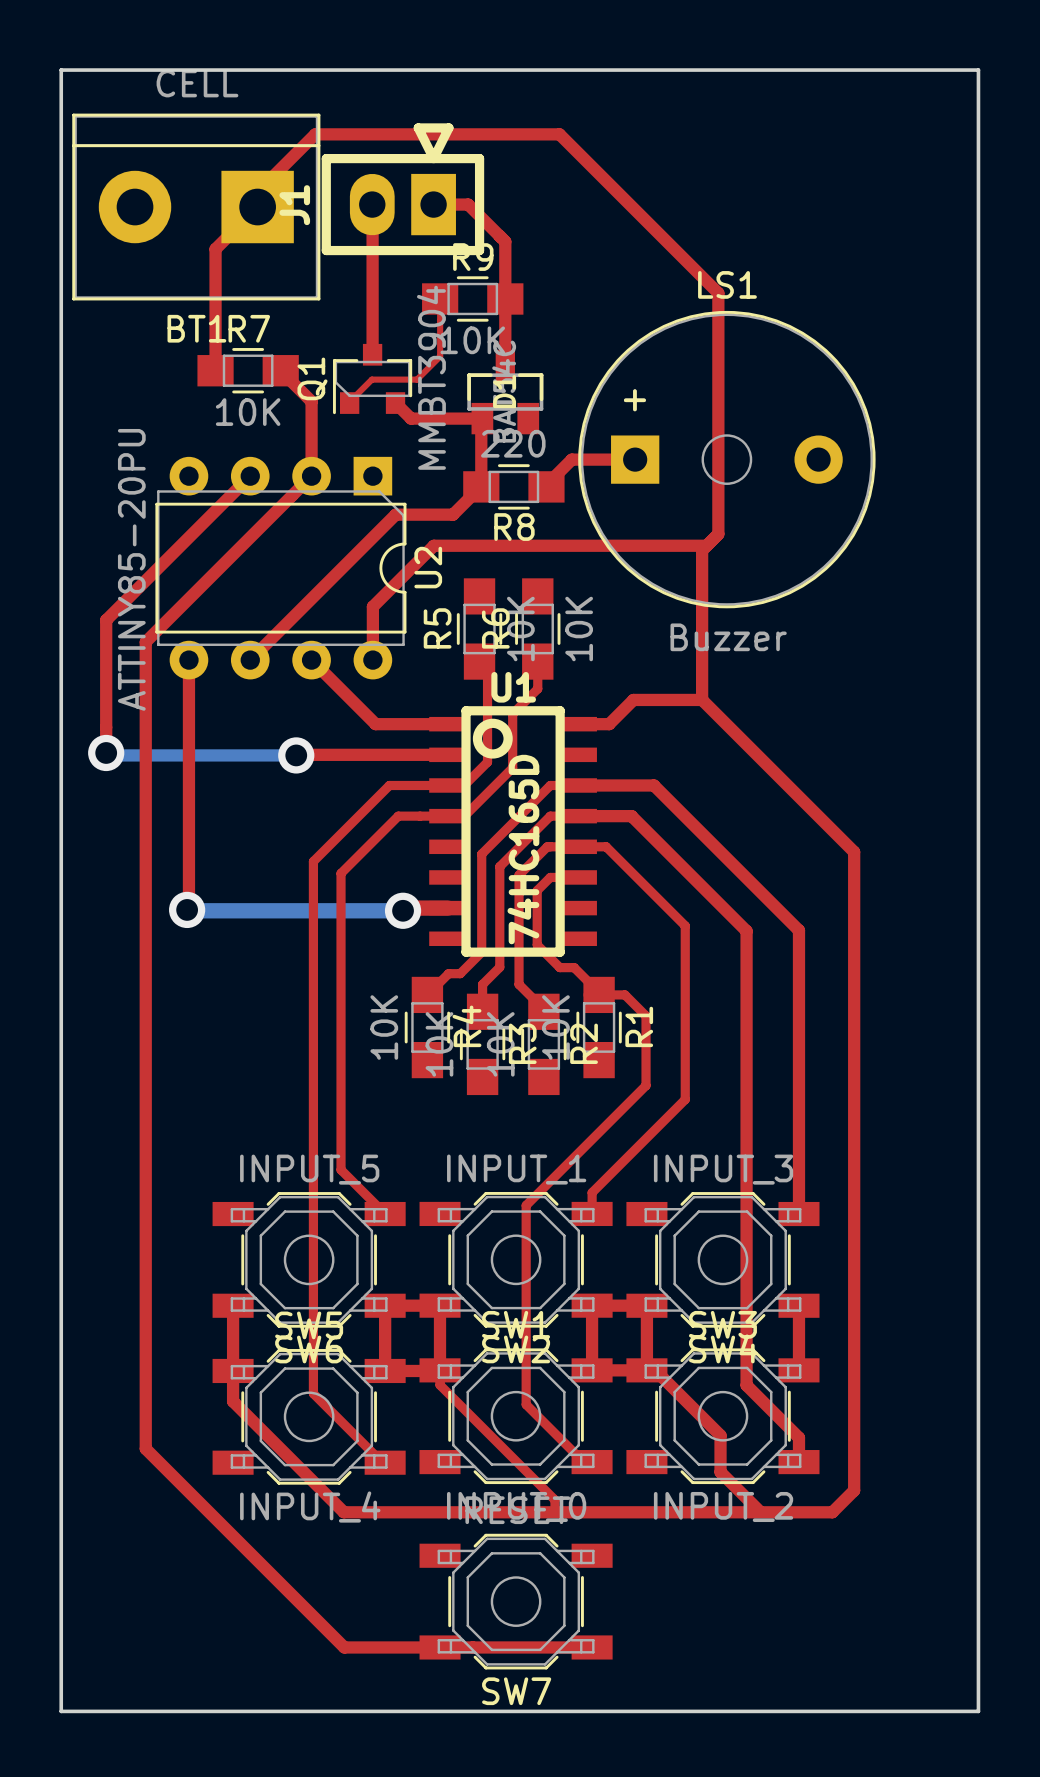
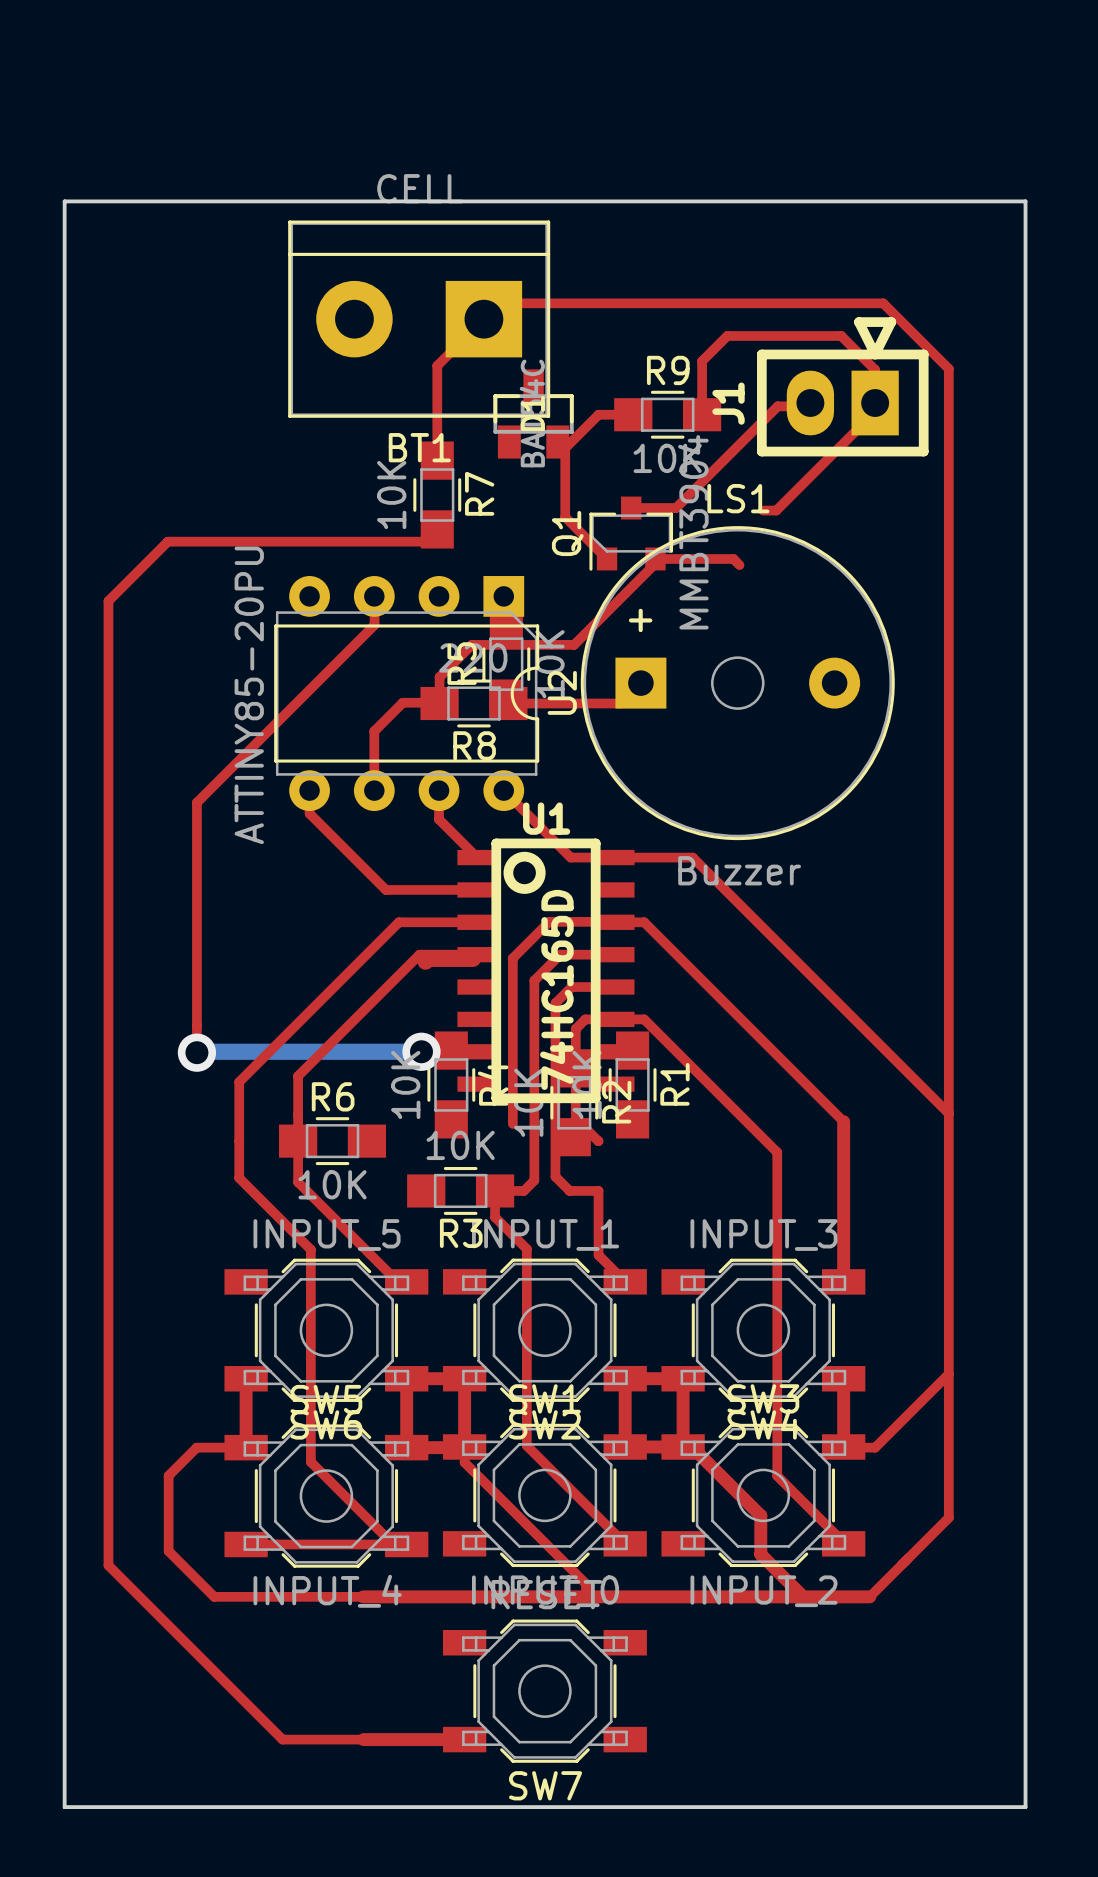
top track: (261, 188) (315, 134) (559, 134) (718, 293) (718, 534) (702, 550) (702, 699) -> none
J1 position: (402, 189) -> (842, 386)
board edge: (61, 190) (61, 70) (978, 70) (978, 1711) (971, 1711) -> (64, 201) (1025, 201) (1025, 1807)
top track: (372, 204) (372, 354) -> none
top track: (433, 204) (468, 204) (505, 241) (505, 365) -> none
BT1 position: (196, 207) -> (419, 319)
top track: (257, 207) (215, 249) (215, 370) -> none
top track: (440, 298) (440, 356) (417, 379) (371, 379) (349, 403) -> none
R9 position: (472, 298) -> (667, 414)
R7 rotation: 0° (248, 370) -> 90° clockwise (437, 495)
R7 position: (248, 370) -> (437, 495)
top track: (280, 370) (311, 401) (311, 476) (145, 642) (145, 1448) (344, 1647) -> (439, 530) (428, 541) (167, 541) (108, 601) (108, 1565) (282, 1739) (363, 1739)
Q1 position: (372, 379) -> (631, 533)
top track: none -> (812, 406) (777, 406) (676, 508) (631, 508)
top track: none -> (633, 414) (598, 414) (565, 448) (565, 517) (607, 558)
top track: none -> (702, 414) (702, 361) (727, 335) (841, 335) (875, 369) (875, 411) (776, 510) (763, 510)
top track: (395, 403) (411, 418) (482, 418) (481, 486) (453, 514) (395, 514) (250, 660) -> none
top track: (635, 459) (571, 459) (545, 486) -> none
LS1 position: (726, 459) -> (737, 683)
top track: (250, 476) (106, 620) (106, 752) -> none
R8 position: (513, 486) -> (473, 703)
top track: none -> (739, 565) (733, 558) (655, 558) (655, 563) (574, 644) (471, 644) (439, 677) (439, 703) (450, 703)
top track: (706, 545) (433, 545) (372, 606) (372, 660) -> none
top track: none -> (374, 597) (374, 625) (196, 802) (196, 1052)
U2 position: (280, 568) -> (406, 693)
R6 rotation: 0° (537, 629) -> 90° clockwise (332, 1141)
R6 position: (537, 629) -> (332, 1141)
top track: none -> (640, 683) (620, 703) (508, 703)
top track: (188, 660) (188, 908) (187, 909) -> none
top track: (311, 660) (375, 724) (447, 724) -> none
top track: (479, 661) (487, 669) (487, 762) (464, 785) (389, 785) (313, 861) (313, 1393) (382, 1462) -> (246, 1544) (403, 1544)
top track: (537, 661) (537, 688) (512, 713) (512, 767) (464, 816) (398, 816) (341, 873) (341, 1169) (385, 1214) -> (477, 954) (419, 954) (298, 1076) (298, 1182) (397, 1281) (406, 1281)
top track: none -> (441, 702) (402, 702) (374, 731) (374, 790)
top track: (702, 699) (854, 851) (854, 1490) (832, 1512) (823, 1512) -> (437, 460) (437, 365) (499, 303) (883, 303) (948, 368) (948, 1517) (869, 1596)
top track: (702, 699) (633, 699) (609, 724) (578, 724) -> none
top track: none -> (309, 790) (309, 813) (385, 889) (477, 889)
top track: none -> (439, 790) (439, 819) (477, 857)
top track: none -> (503, 790) (570, 857) (692, 857) (948, 1113)
bottom track: (106, 752) (108, 755) (296, 755) -> none
via: (106, 752) -> none
top track: (447, 754) (296, 755) -> none
via: (296, 755) -> none
top track: (578, 785) (654, 785) (798, 930) (798, 1062) -> (614, 922) (644, 922) (843, 1121)
top track: (589, 785) (550, 785) (481, 854) (481, 952) (460, 973) (448, 973) (427, 994) -> none
U1 position: (513, 831) -> (545, 970)
top track: none -> (477, 922) (398, 922) (239, 1081) (239, 1178) (310, 1249) (310, 1462) (393, 1544)
top track: none -> (615, 921) (549, 921) (512, 958) (512, 1123)
top track: (578, 877) (550, 877) (537, 890) (537, 944) (559, 967) (574, 967) (599, 992) (599, 994) -> none
bottom track: (187, 909) (403, 910) -> none
via position: (187, 909) -> (196, 1052)
via position: (403, 910) -> (421, 1051)
top track: none -> (614, 987) (571, 987) (555, 1003) (555, 1176) (569, 1190) (598, 1190) (598, 1255) (625, 1281) (629, 1281)
top track: (587, 994) (624, 994) (646, 1015) (646, 1085) (526, 1205) (526, 1404) (583, 1462) (592, 1462) -> (614, 954) (560, 954) (534, 980) (534, 1180) (523, 1190) (495, 1190) (495, 1217) (526, 1249) (526, 1445) (625, 1544)
bottom track: none -> (421, 1051) (196, 1052)
top track: (482, 1011) (482, 984) (499, 967) (499, 866) (550, 816) (631, 816) (746, 931) (746, 1385) (798, 1437) (798, 1462) -> (598, 1141) (575, 1118) (575, 1028) (585, 1019) (644, 1019) (777, 1152) (777, 1475) (843, 1544)
top track: (543, 1011) (543, 1009) (519, 984) (519, 875) (547, 846) (606, 846) (685, 925) (685, 1099) (592, 1192) (592, 1213) -> none
R3 rotation: 0° (482, 1044) -> 90° clockwise (460, 1190)
R3 position: (482, 1044) -> (460, 1190)
top track: none -> (948, 1374) (875, 1447) (843, 1447)
top track: (233, 1370) (233, 1401) (343, 1512) -> (246, 1447) (196, 1447) (168, 1475) (168, 1551) (214, 1596) (363, 1596)
top track: (440, 1647) (592, 1647) -> none

